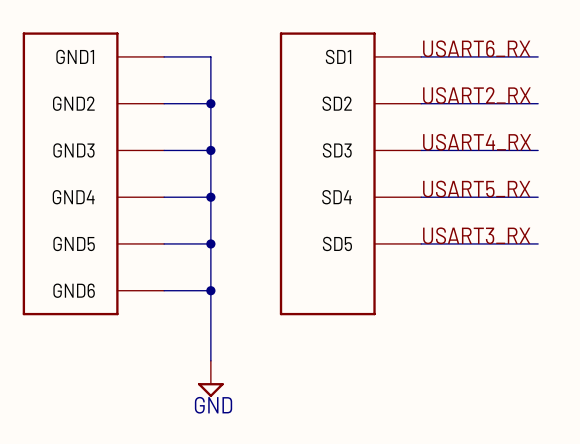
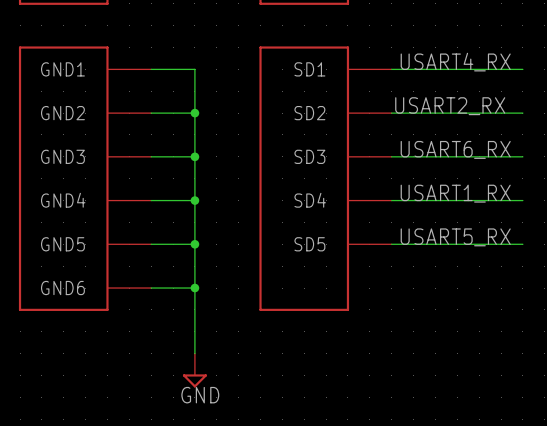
label position: USART6_RX (476, 48) -> USART6_RX (455, 149)
wire: none -> (501, 69) (522, 69)
wire: none -> (501, 113) (522, 113)
label position: USART4_RX (477, 142) -> USART4_RX (455, 62)
wire: none -> (501, 156) (522, 156)
label position: USART5_RX (476, 189) -> USART5_RX (455, 237)
label: none -> USART1_RX (455, 193)
wire: none -> (501, 200) (522, 200)
label: USART3_RX (476, 235) -> none
wire: none -> (501, 244) (522, 244)

